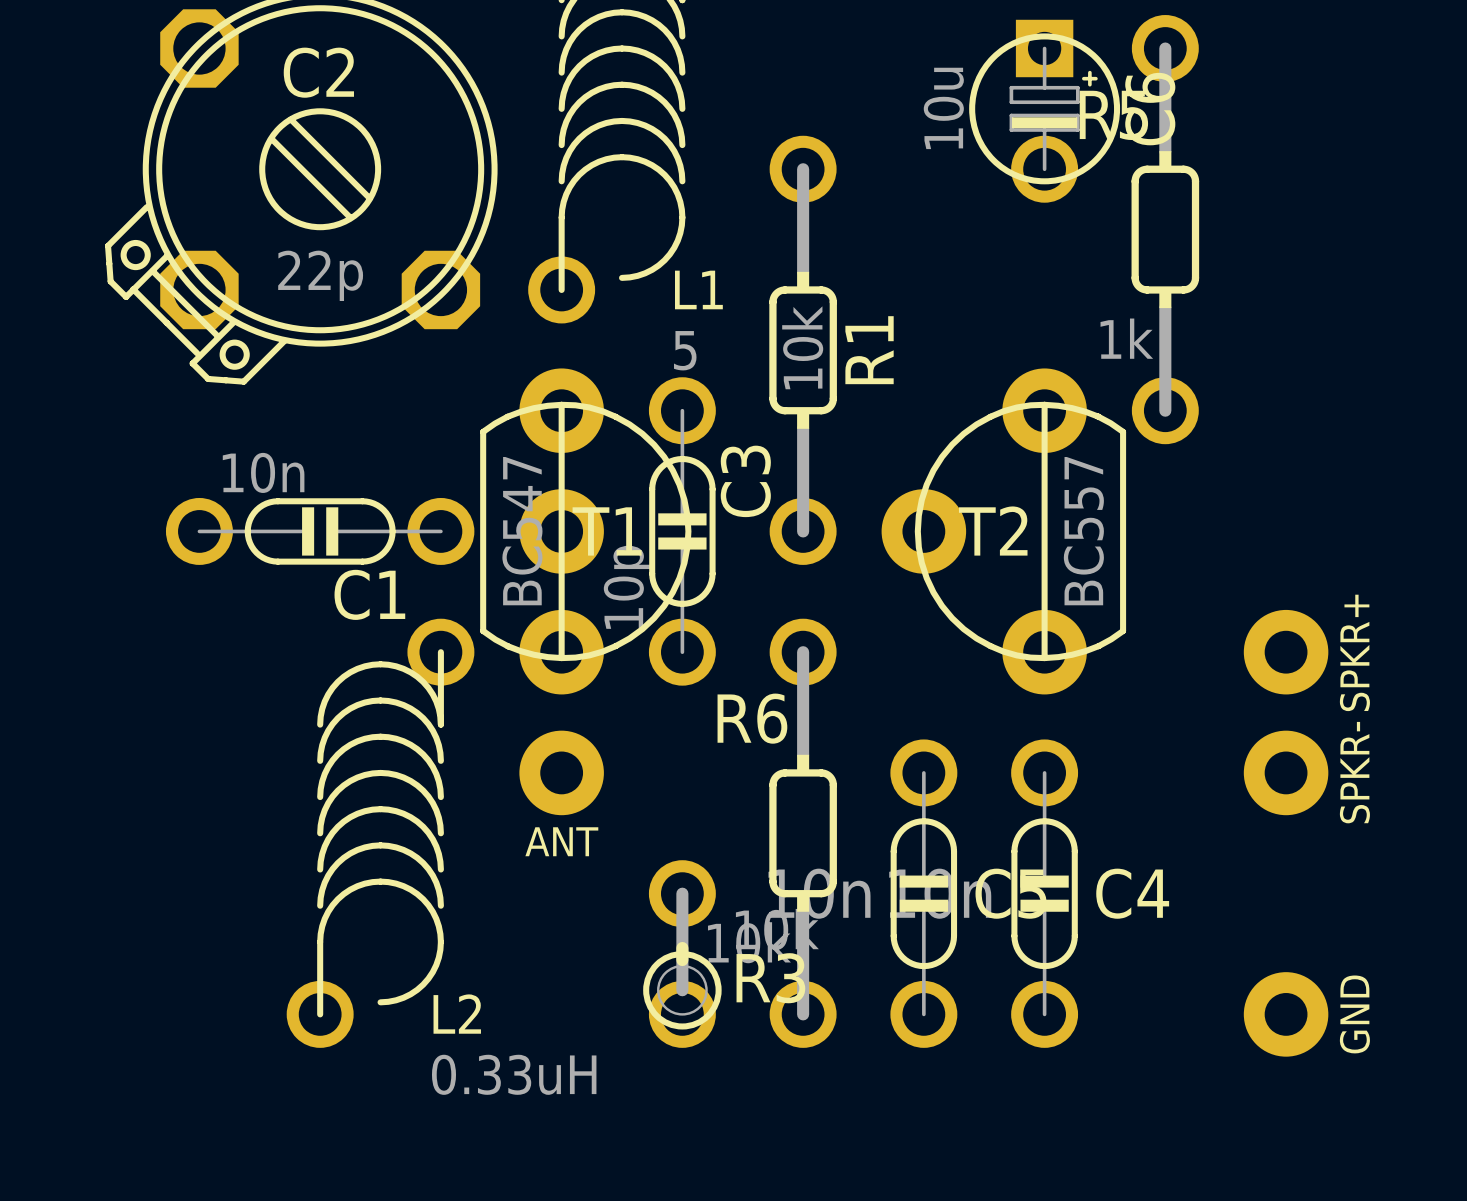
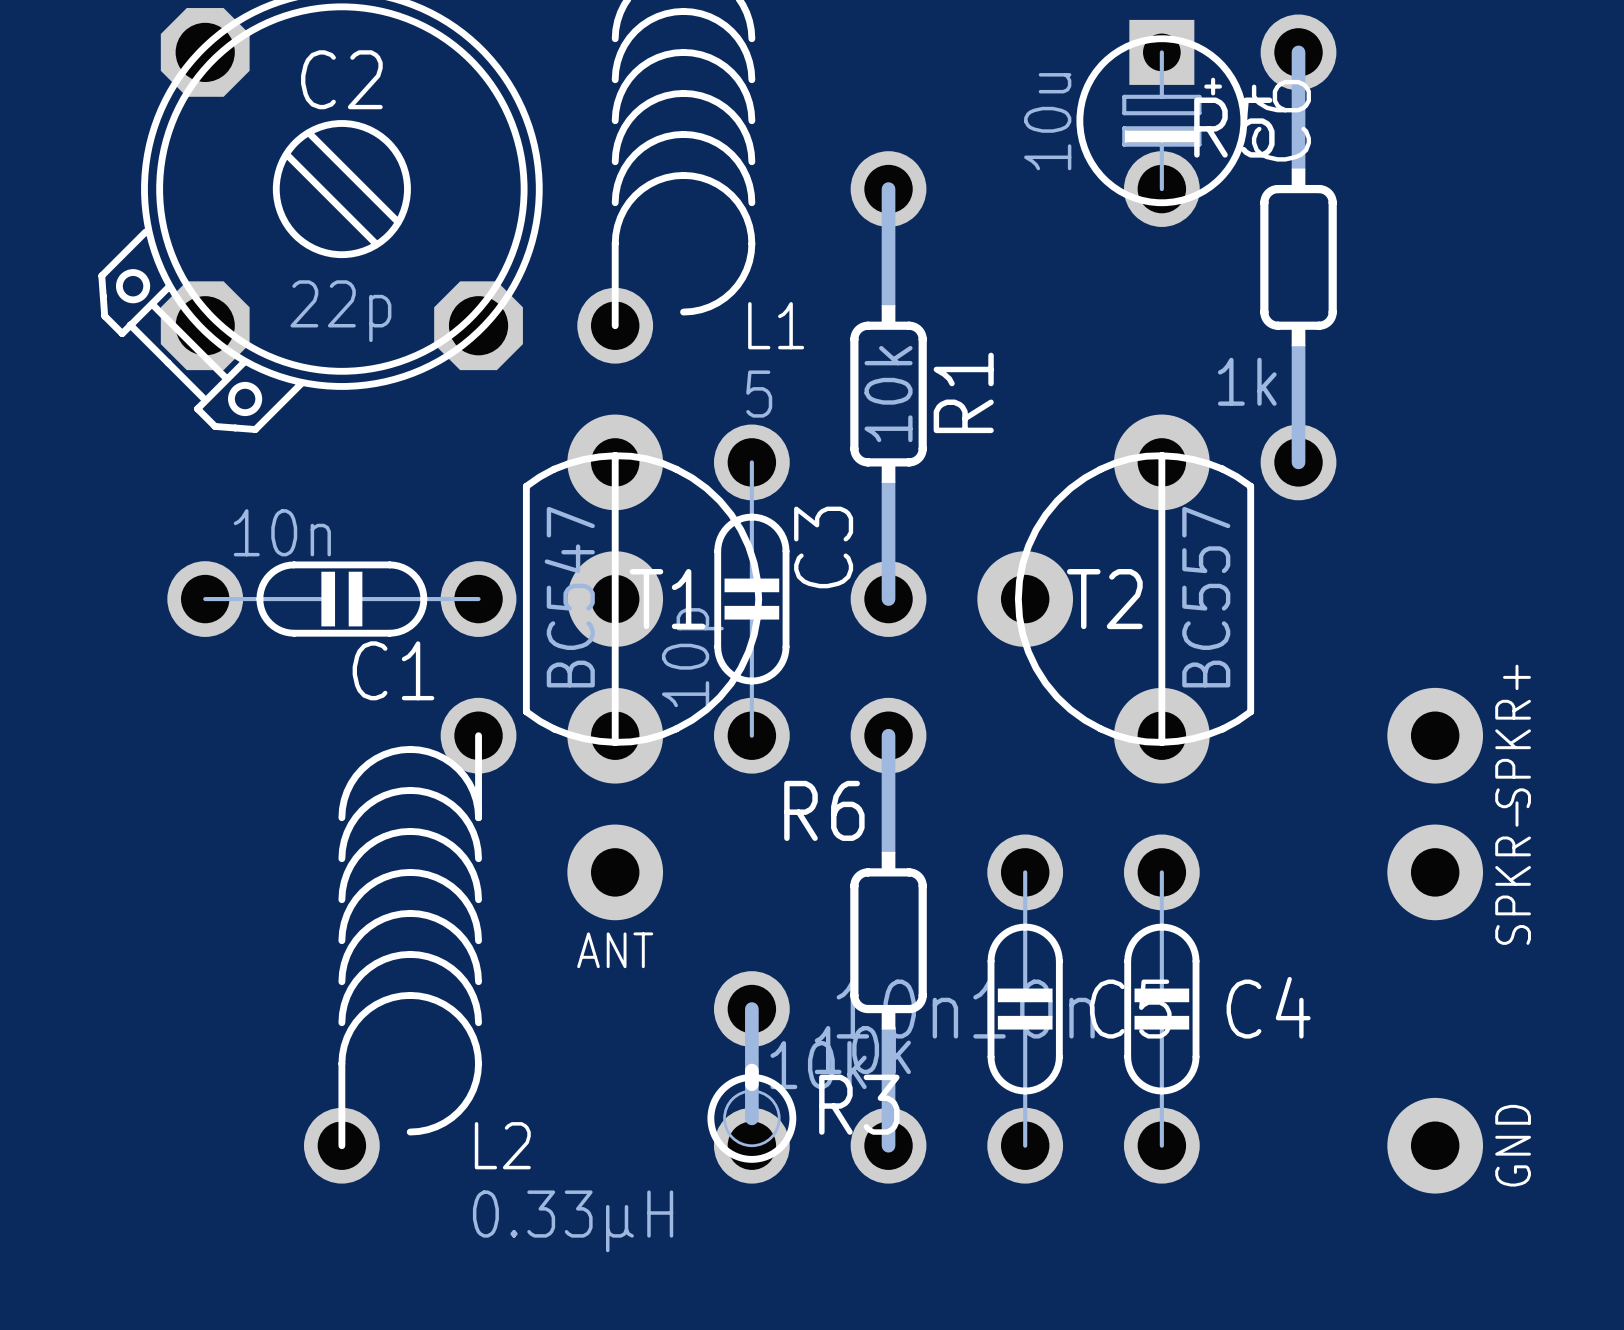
L2 value: 0.33uH (514, 1074) -> 0.33μH (573, 1221)

